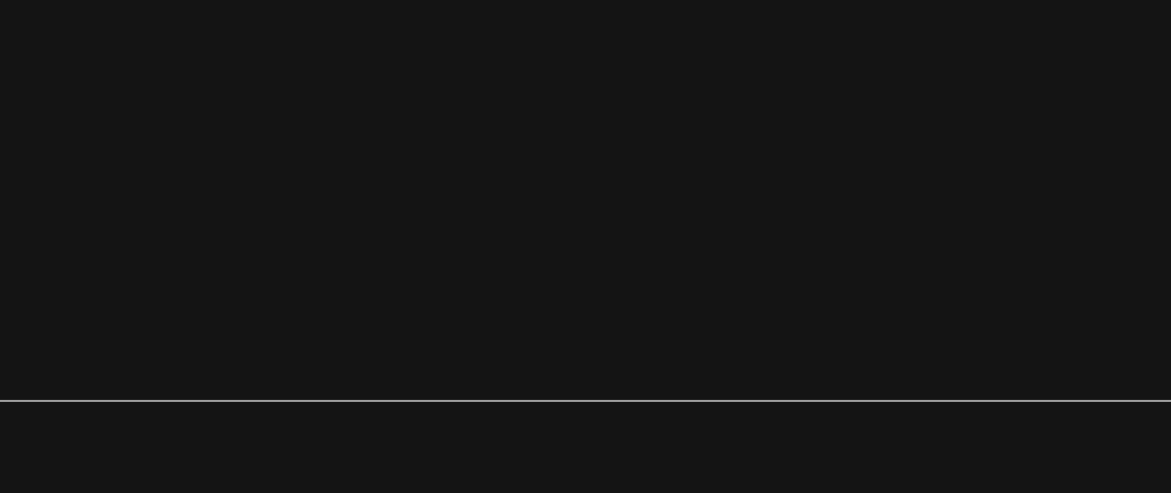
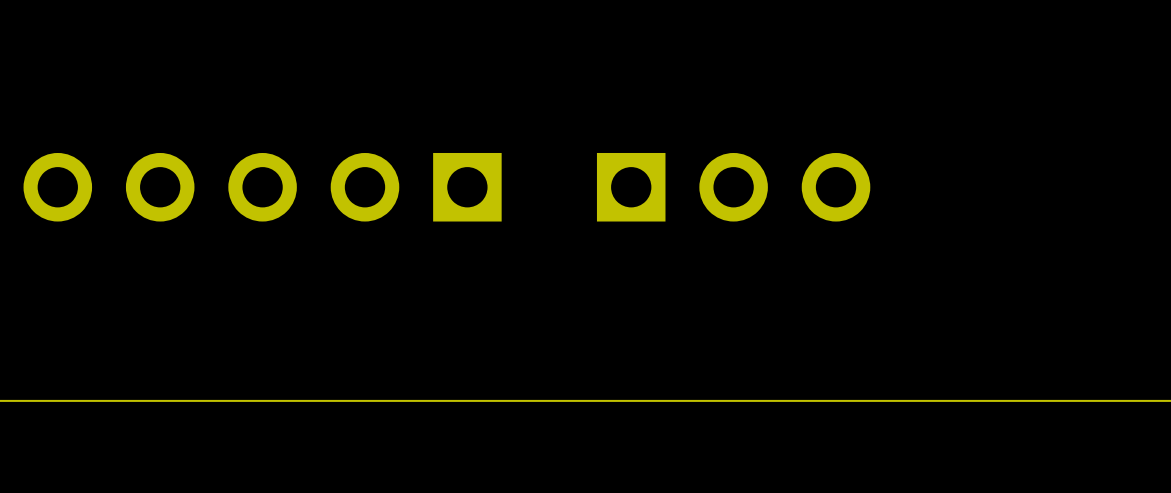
part: none -> (262, 187)
part: none -> (733, 187)

